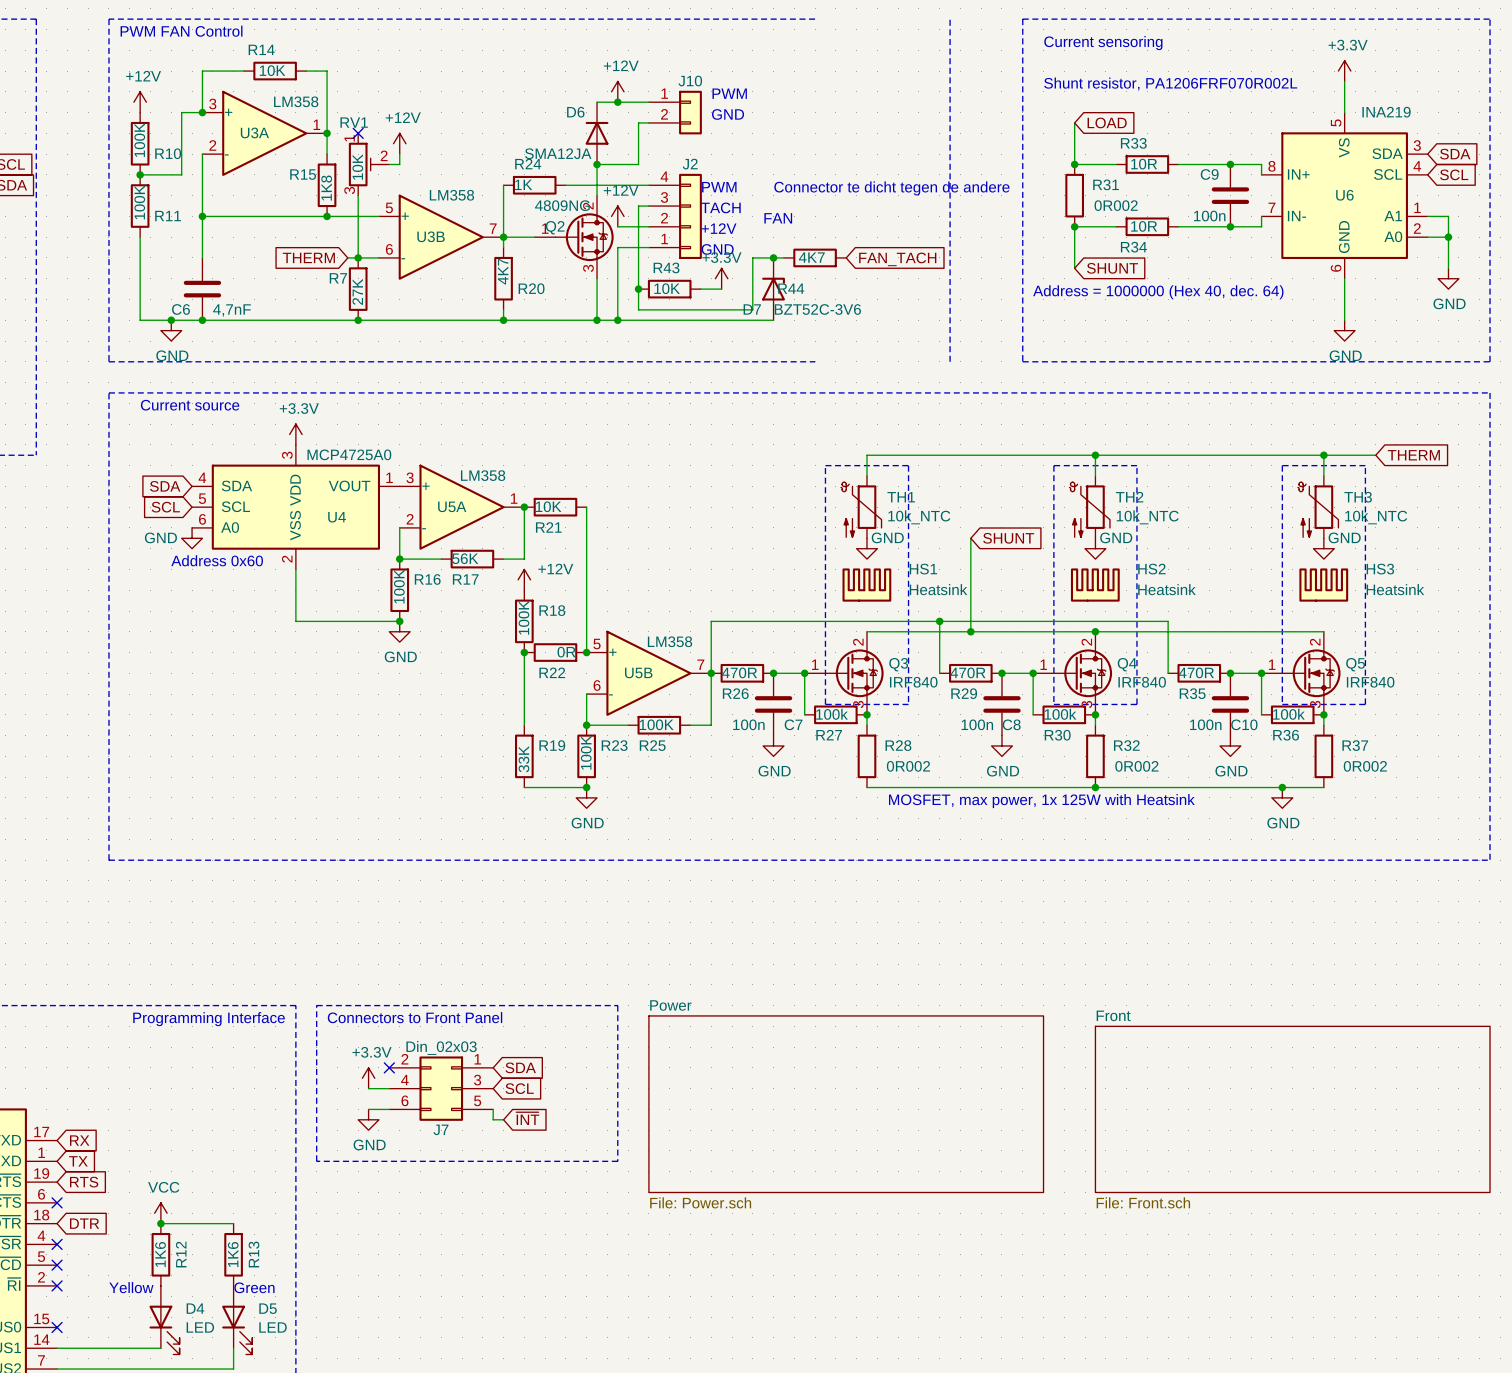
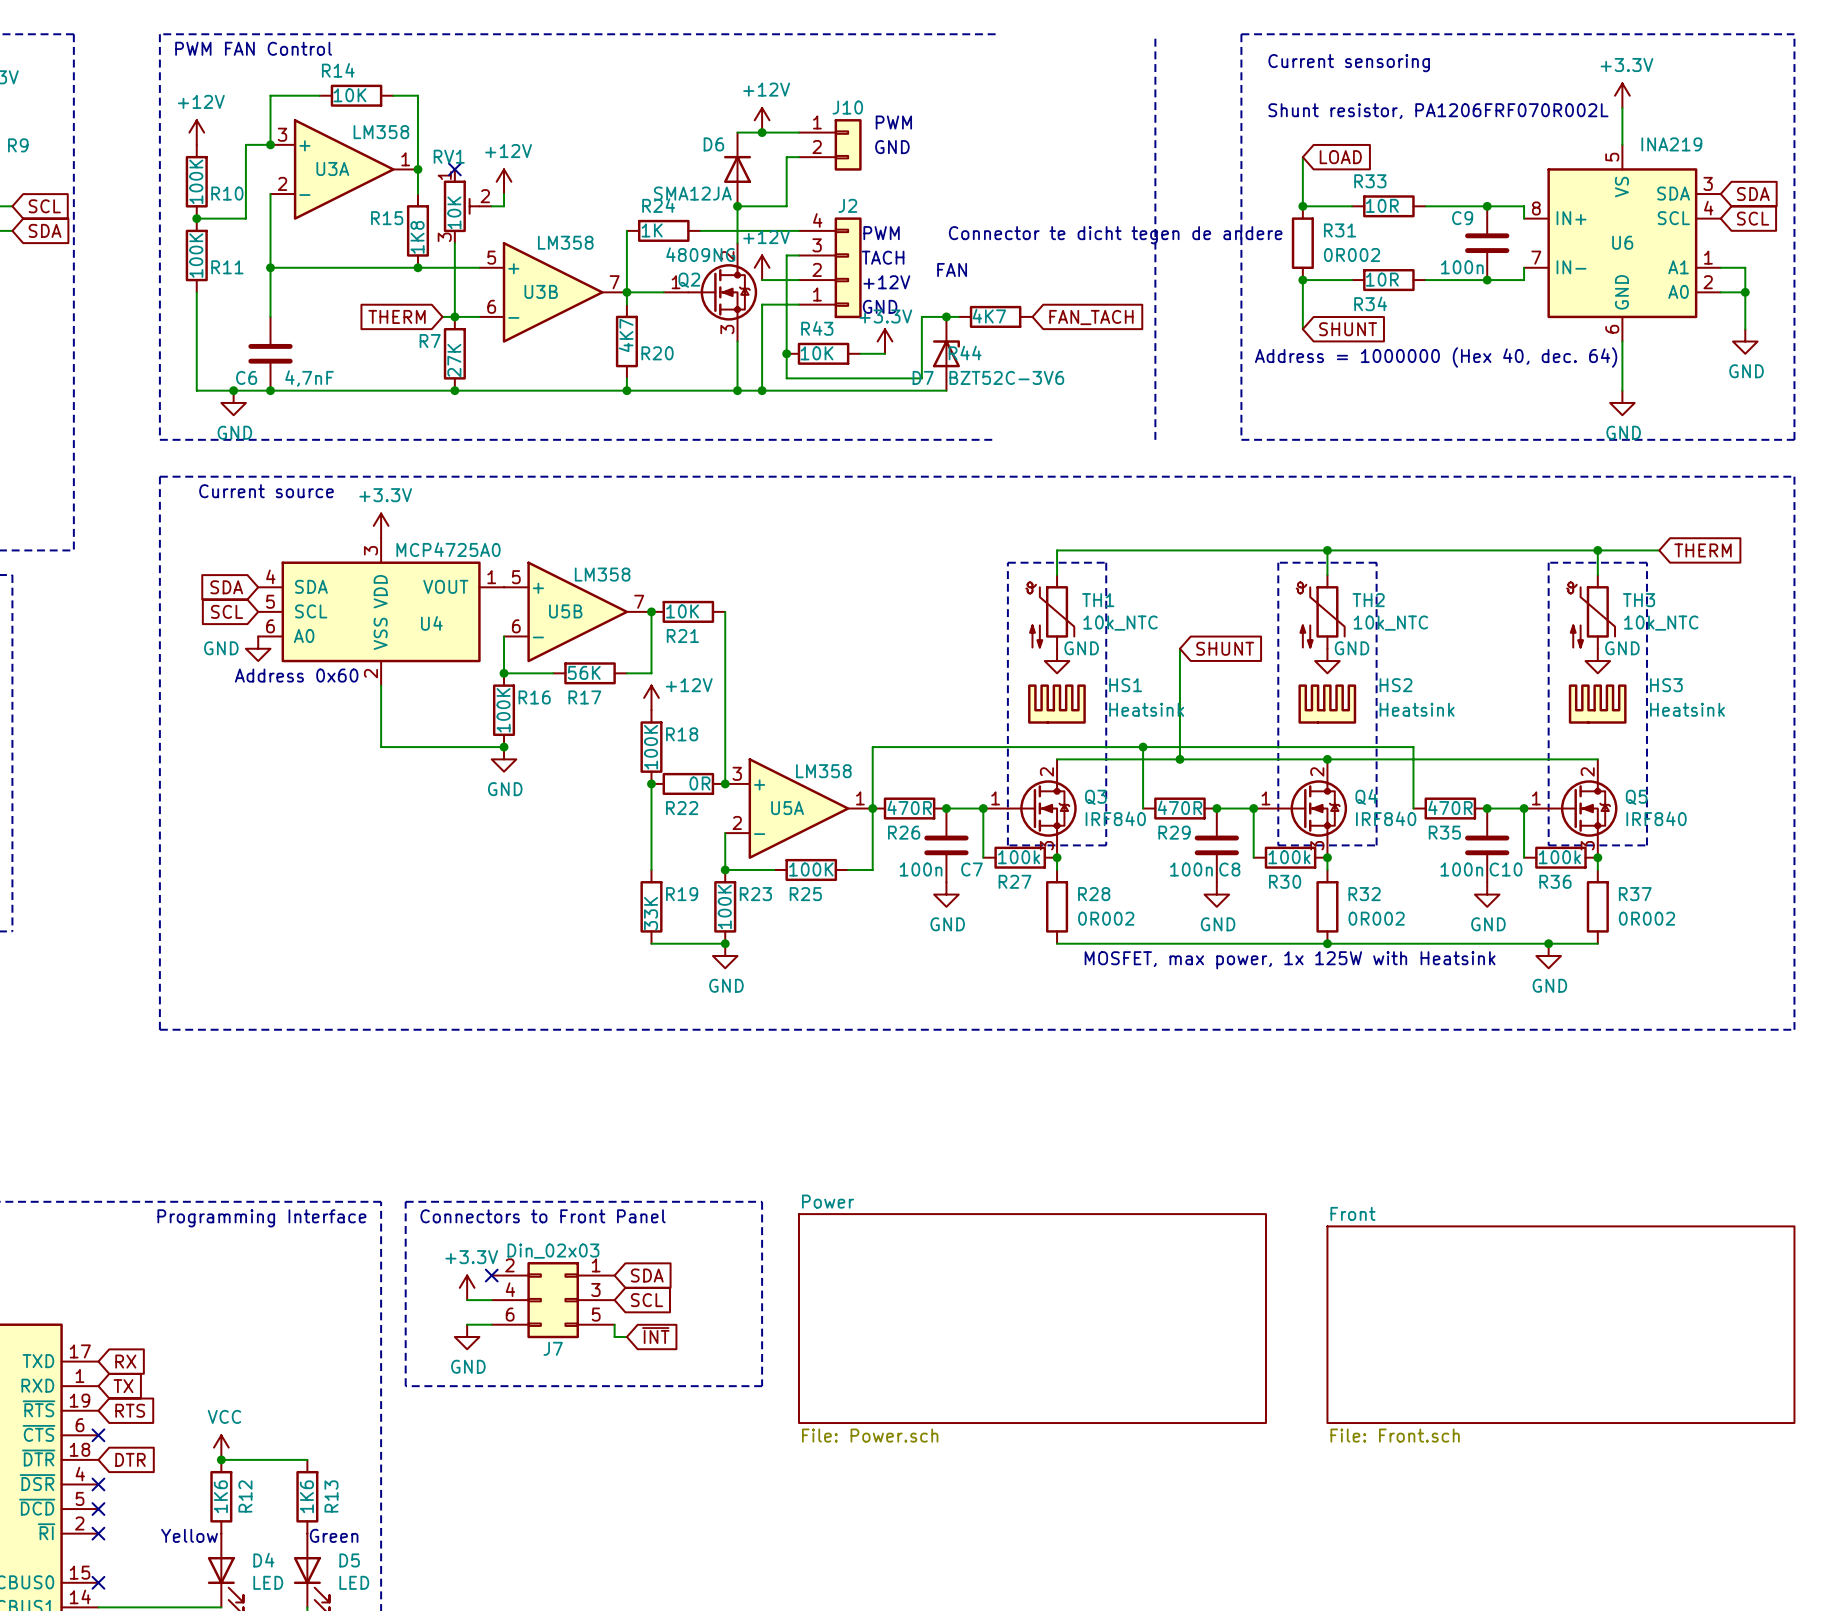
U5A position: (462, 507) -> (798, 808)
U5B position: (648, 673) -> (577, 611)

